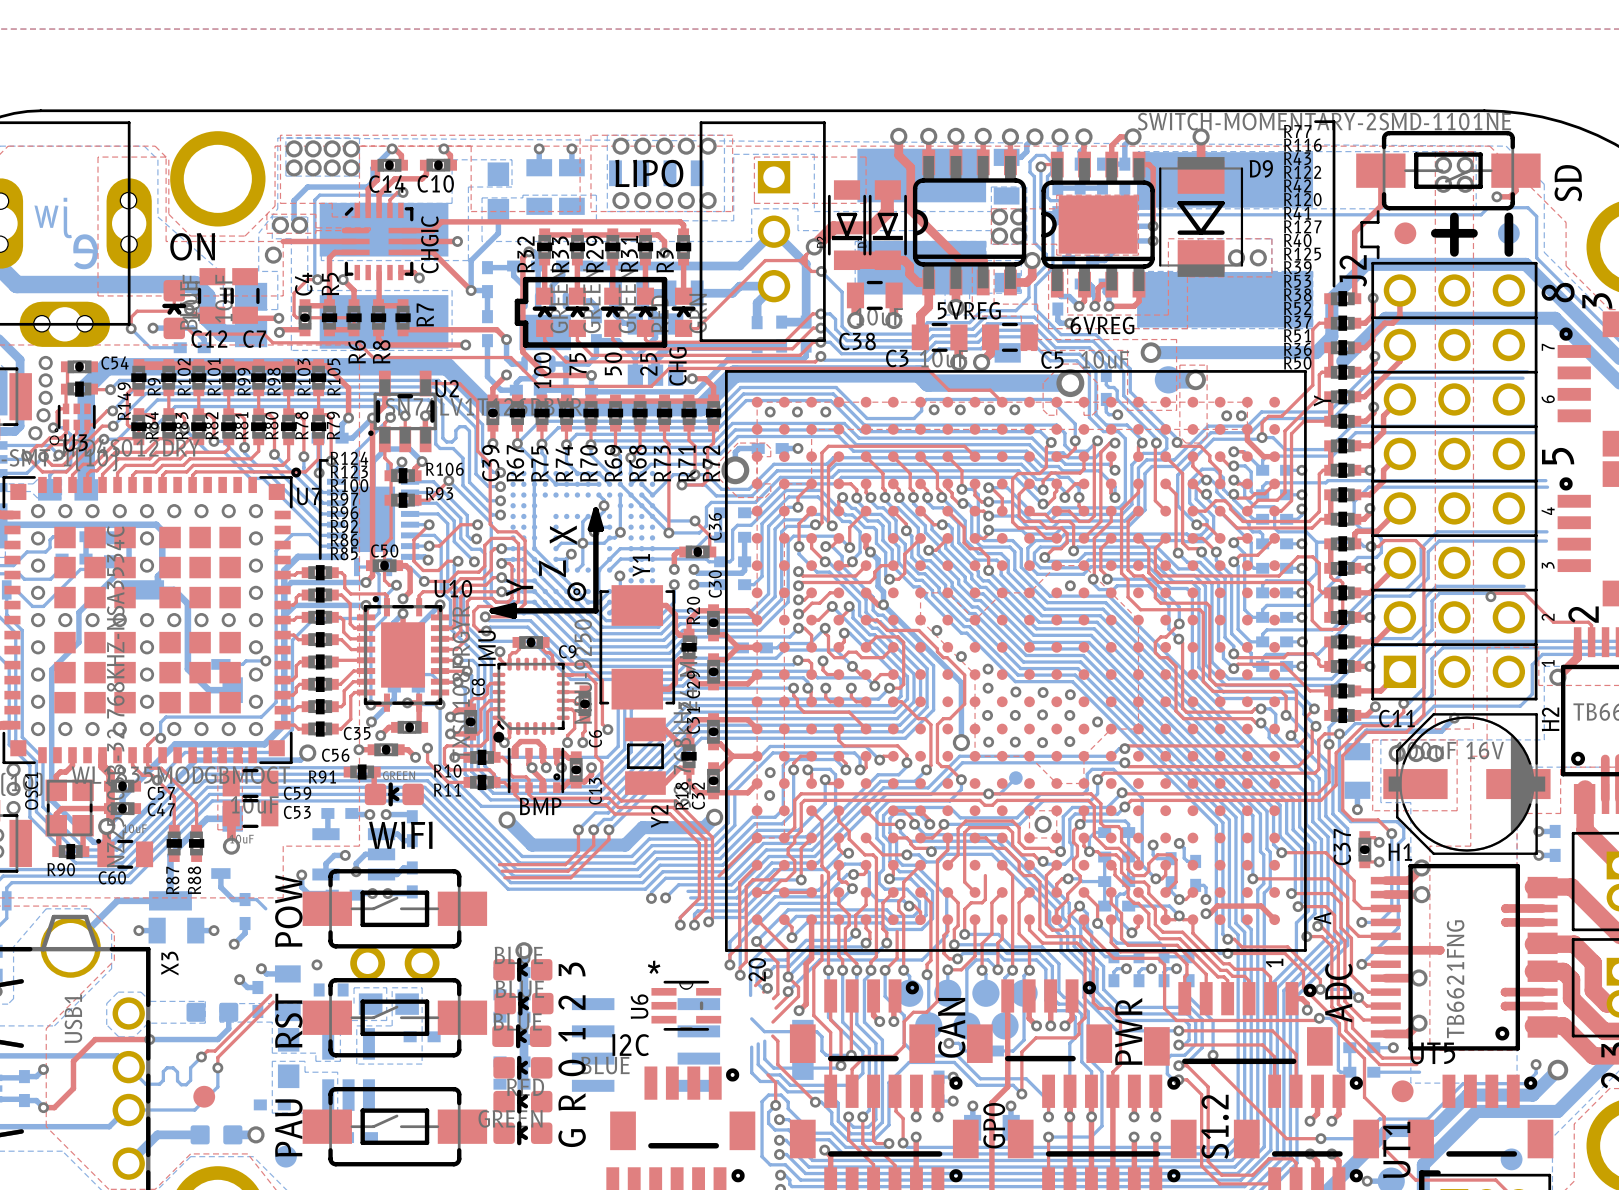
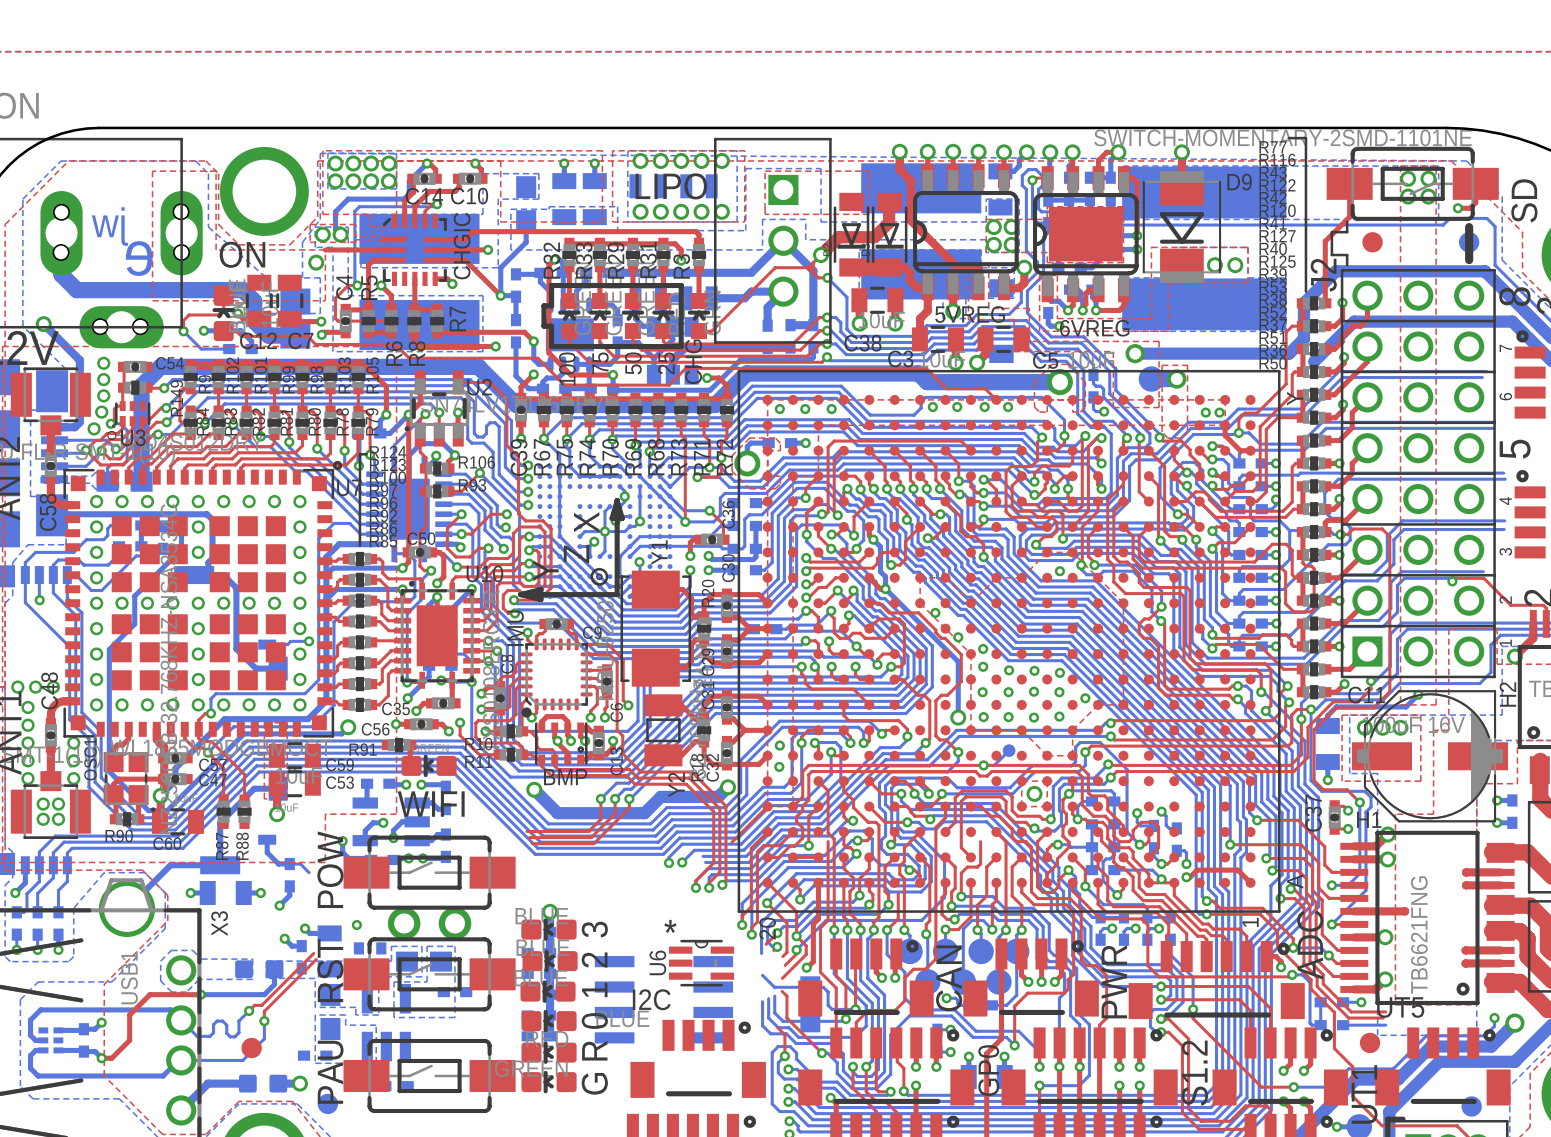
line: (1454, 216) (1454, 252) -> none
line: (1435, 233) (1473, 233) -> none

